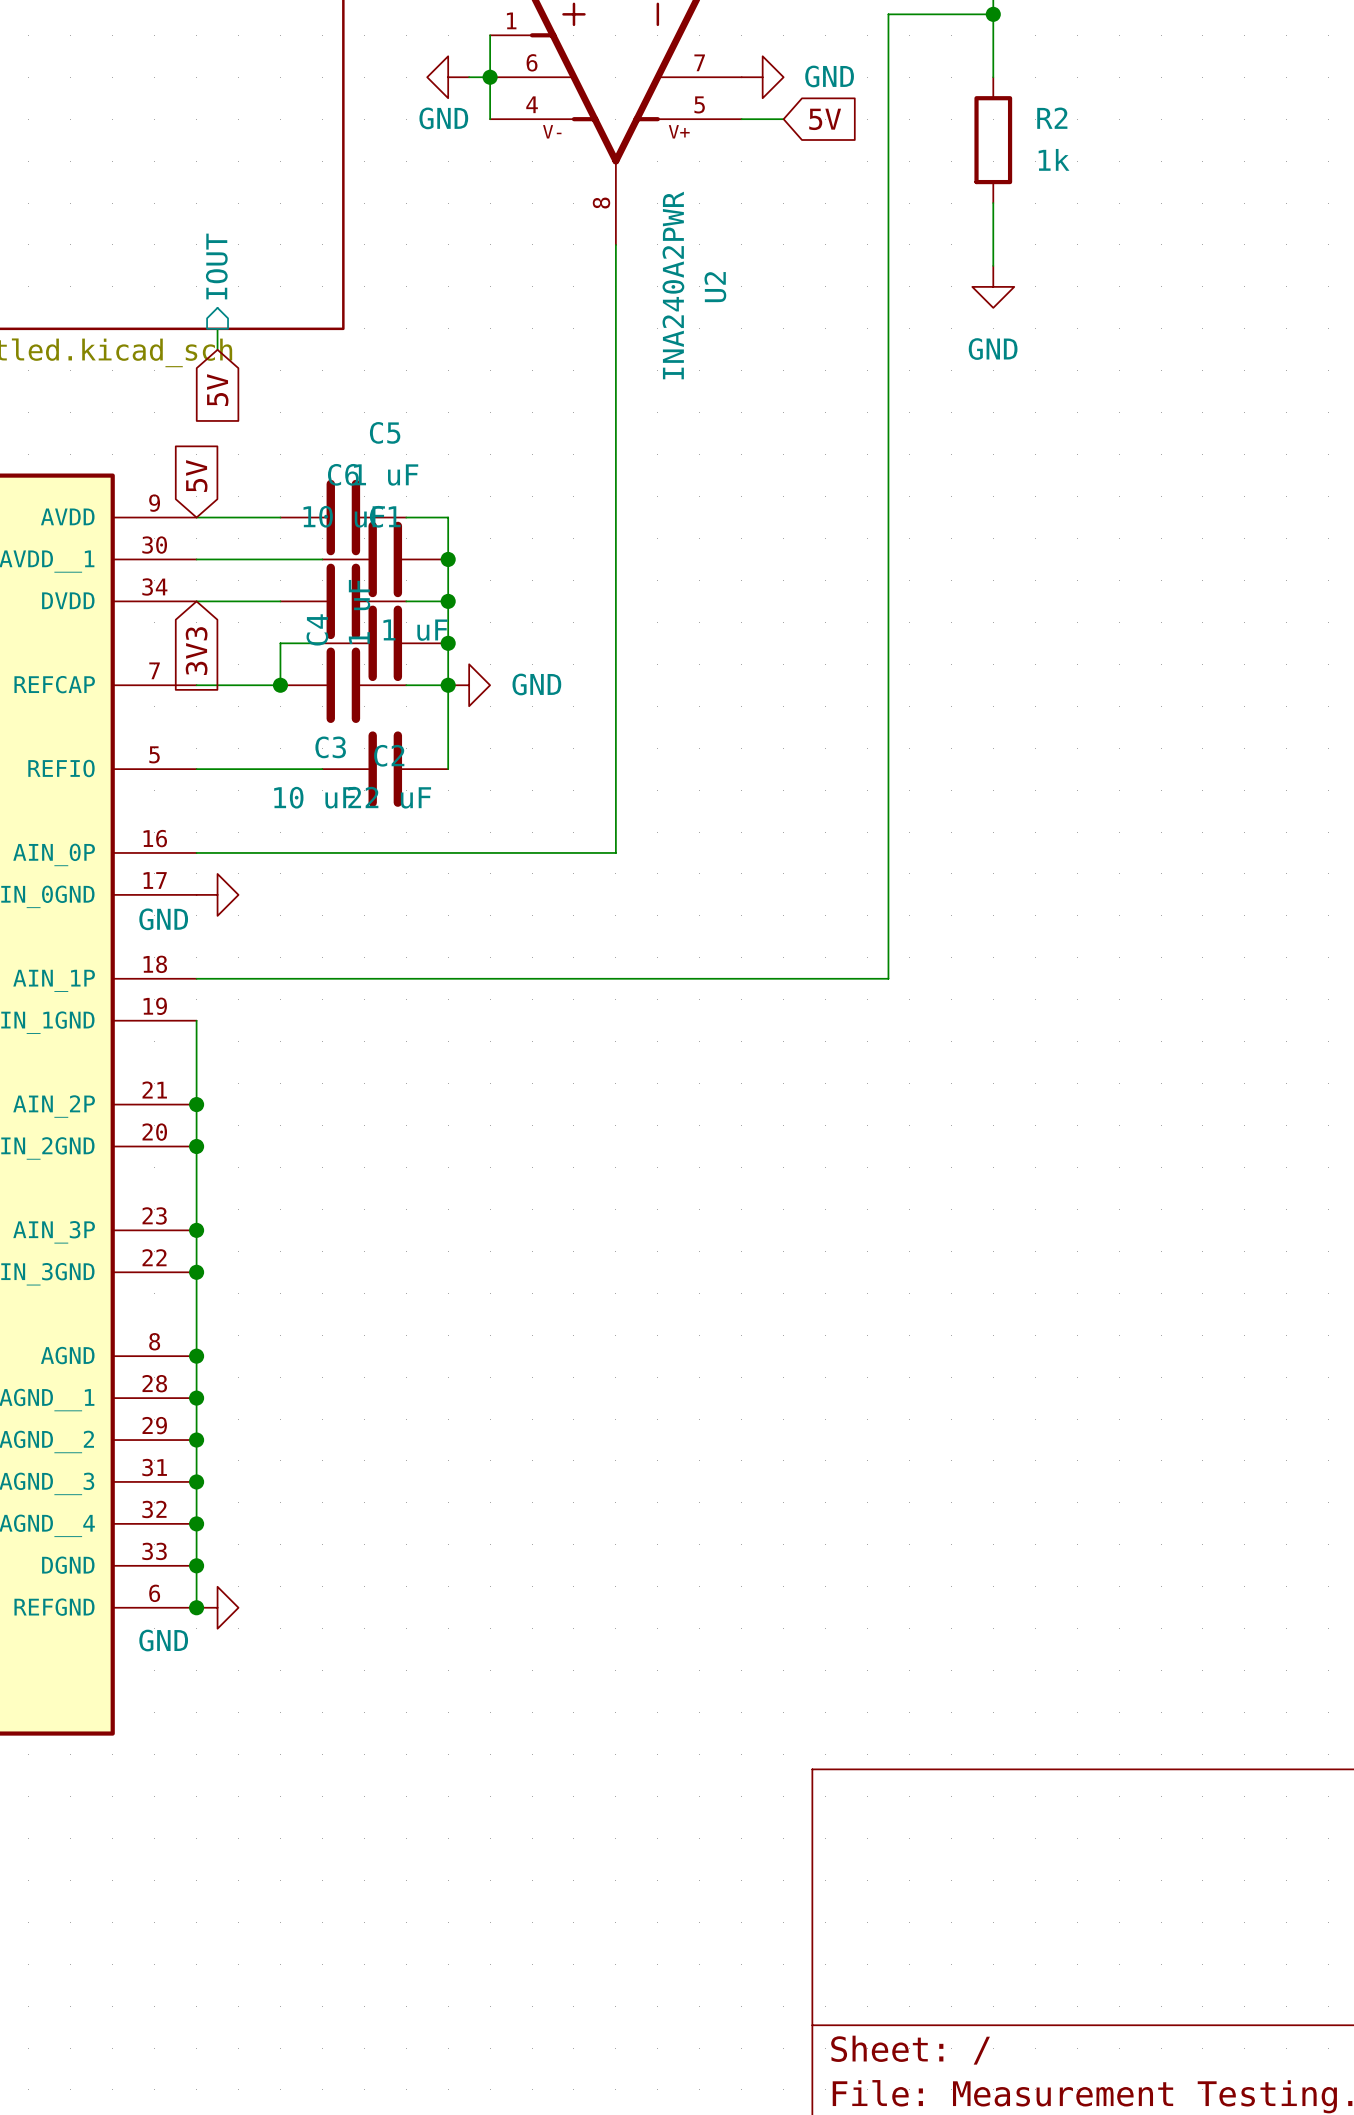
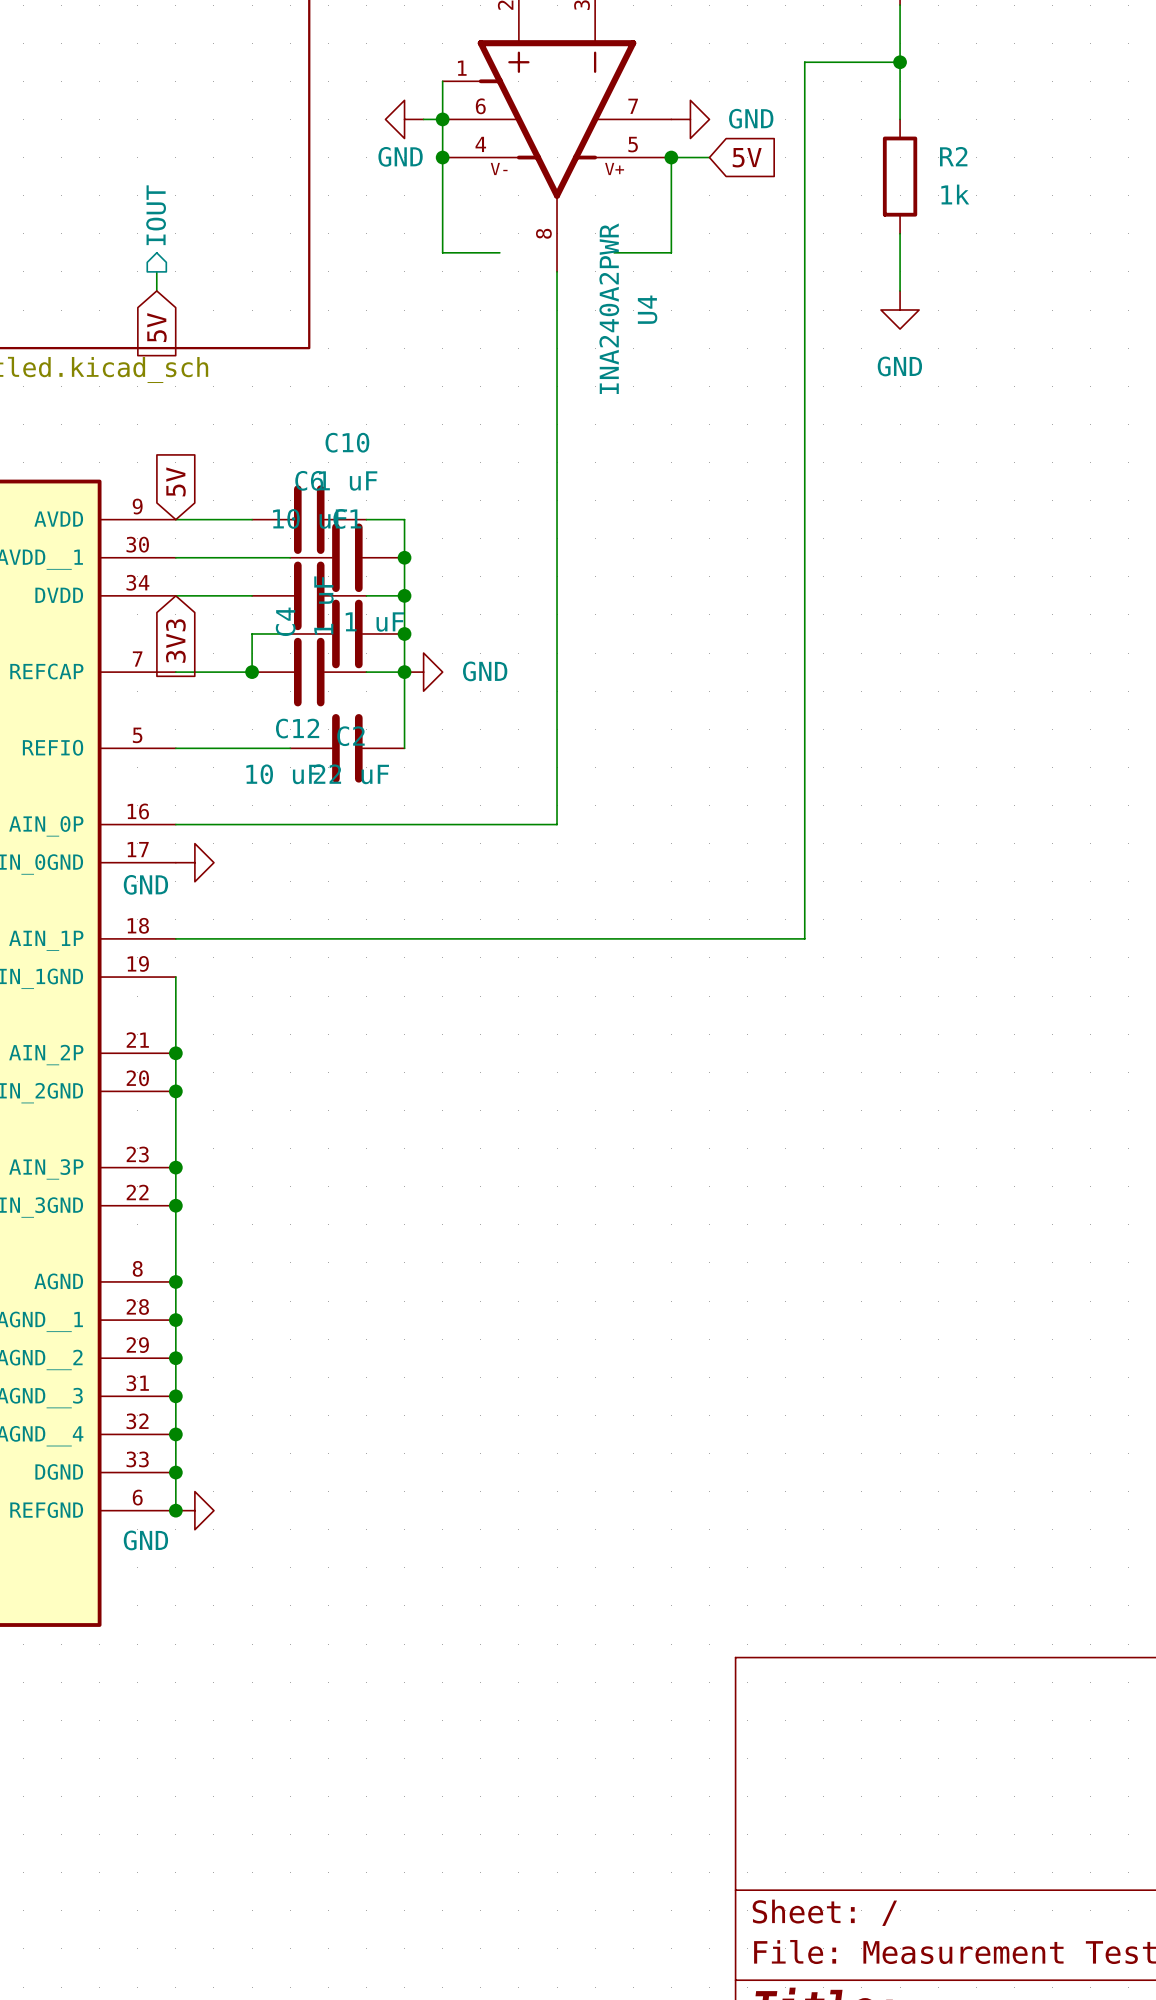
wire: none -> (442, 157) (442, 252) (499, 252)
junction: none -> (442, 157)
wire: none -> (671, 157) (671, 252) (614, 252)
junction: none -> (671, 157)
sheet pin position: IOUT (216, 266) -> IOUT (156, 215)
U2 name: U2 (715, 287) -> U4 (647, 309)
wire: (217, 328) (217, 349) -> (156, 271) (156, 290)
global label position: 5V (217, 390) -> 5V (156, 327)
C5 name: C5 (385, 432) -> C10 (347, 442)
C3 name: C3 (330, 747) -> C12 (297, 728)

